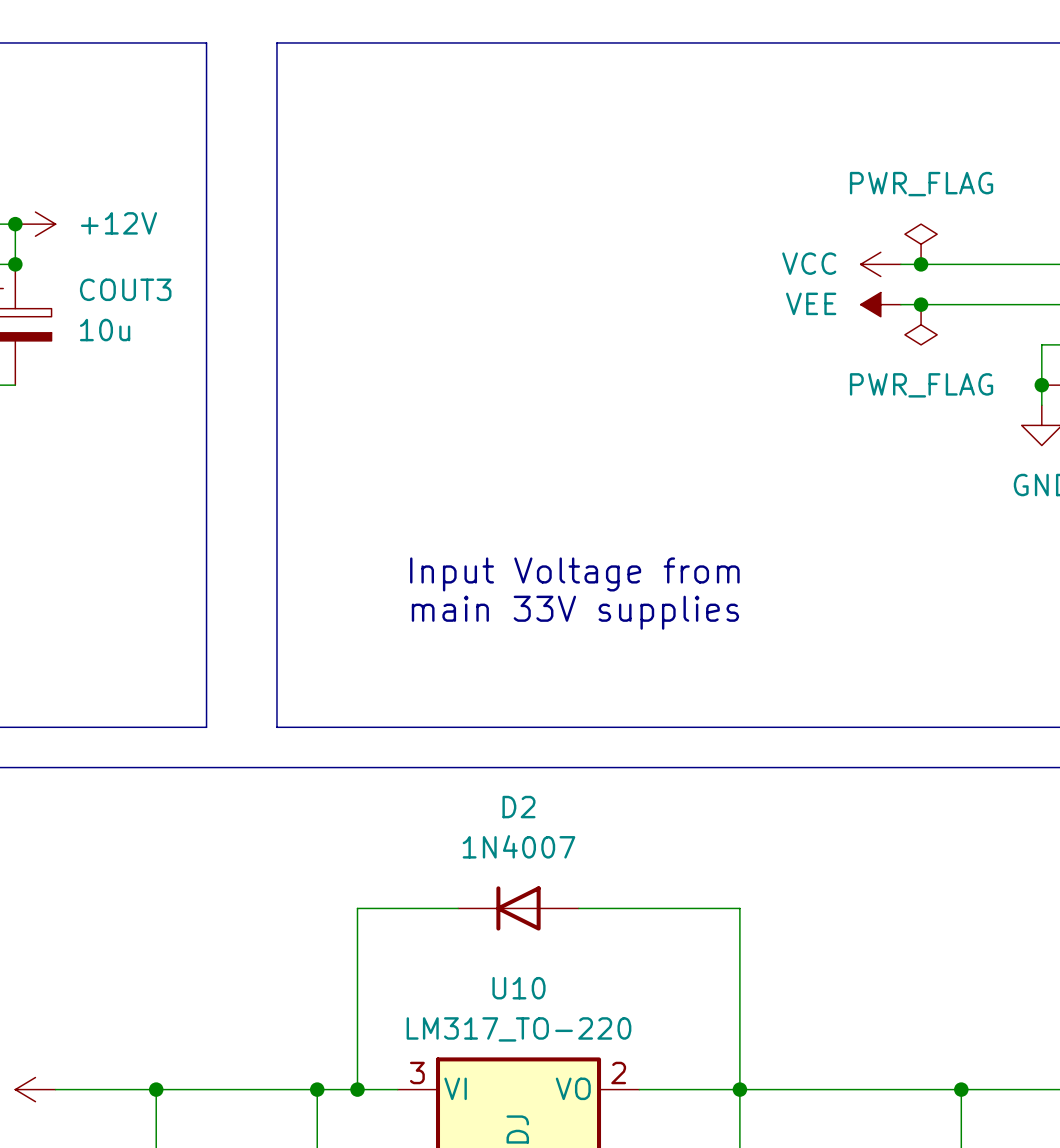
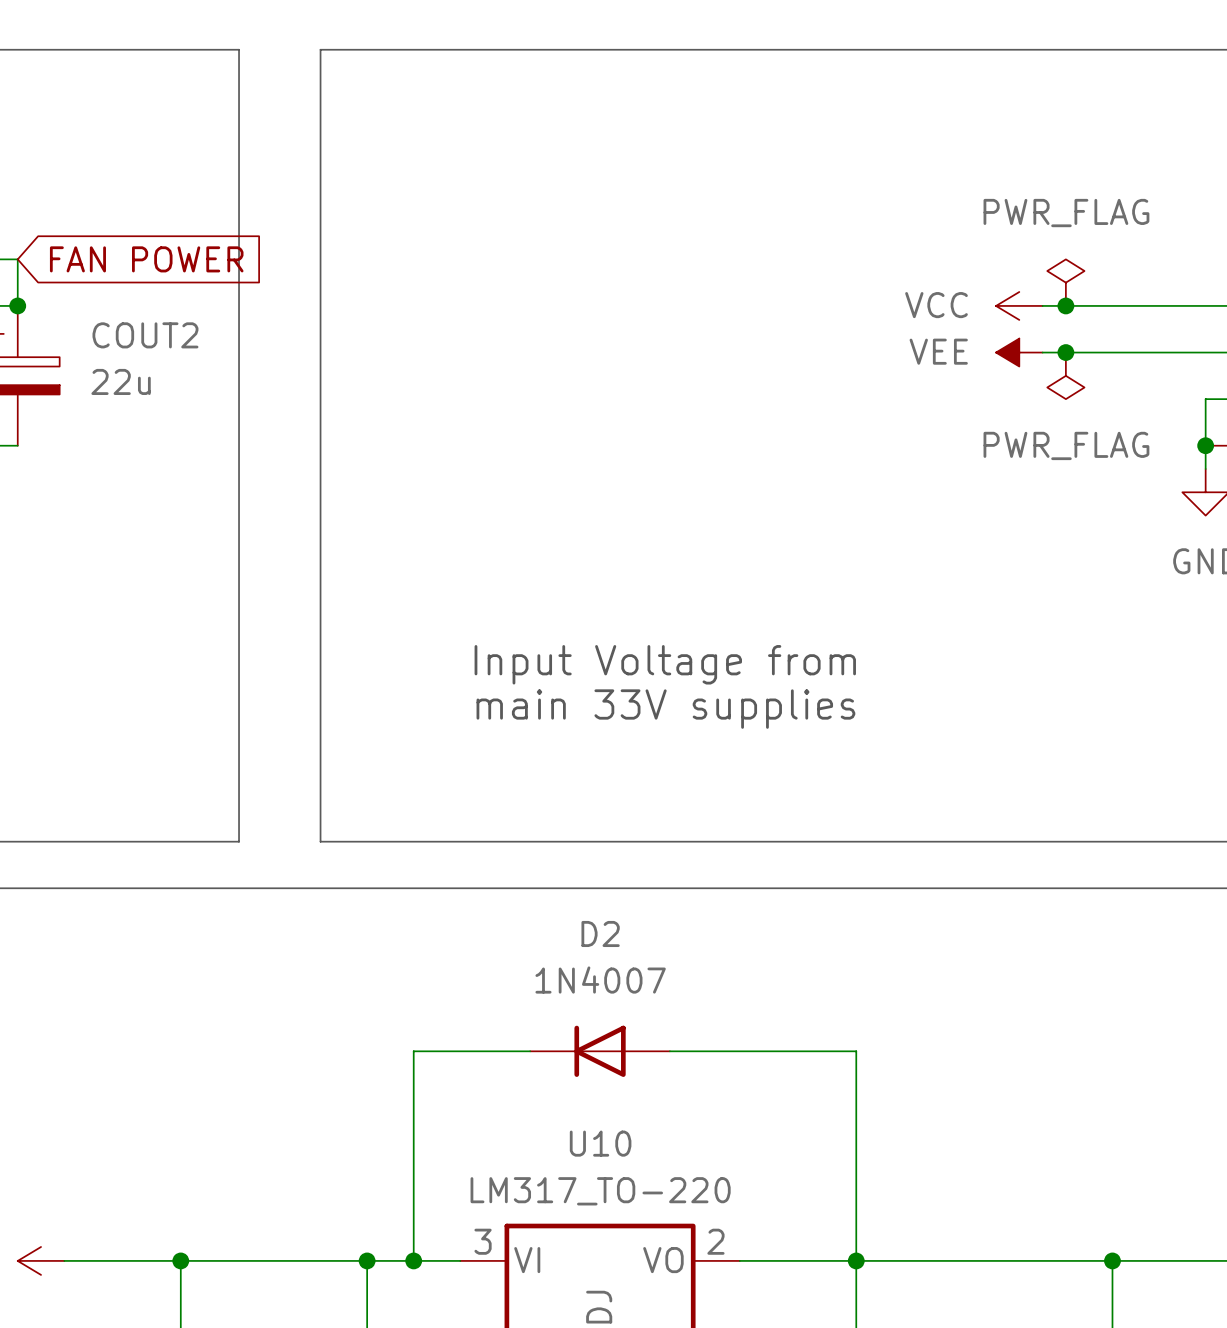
junction: (15, 224) -> none
power symbol: +12V (35, 224) -> none
global label: none -> FAN POWER (146, 259)
COUT3 name: COUT3 (125, 289) -> COUT2 (145, 335)
COUT3 value: 10u (105, 330) -> 22u (121, 381)

